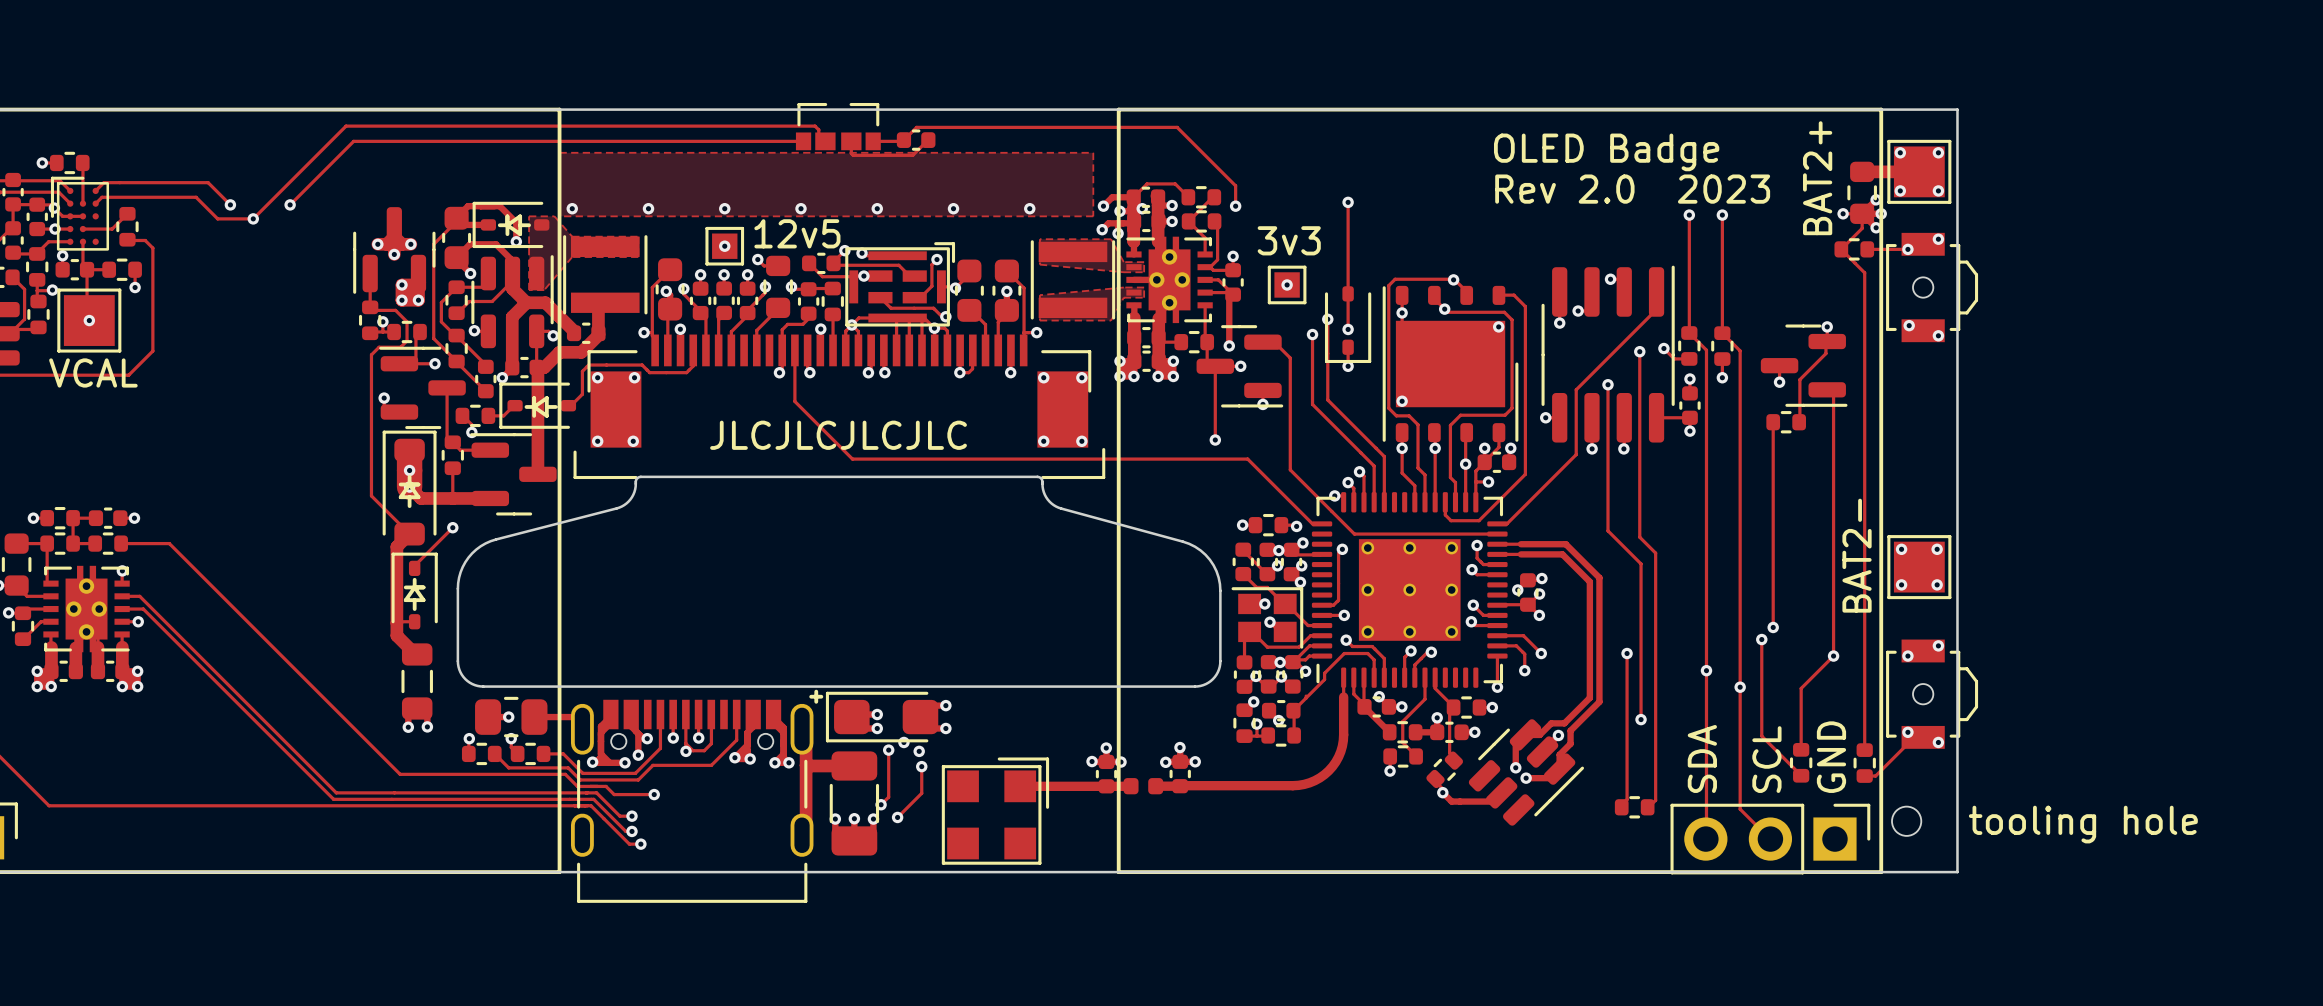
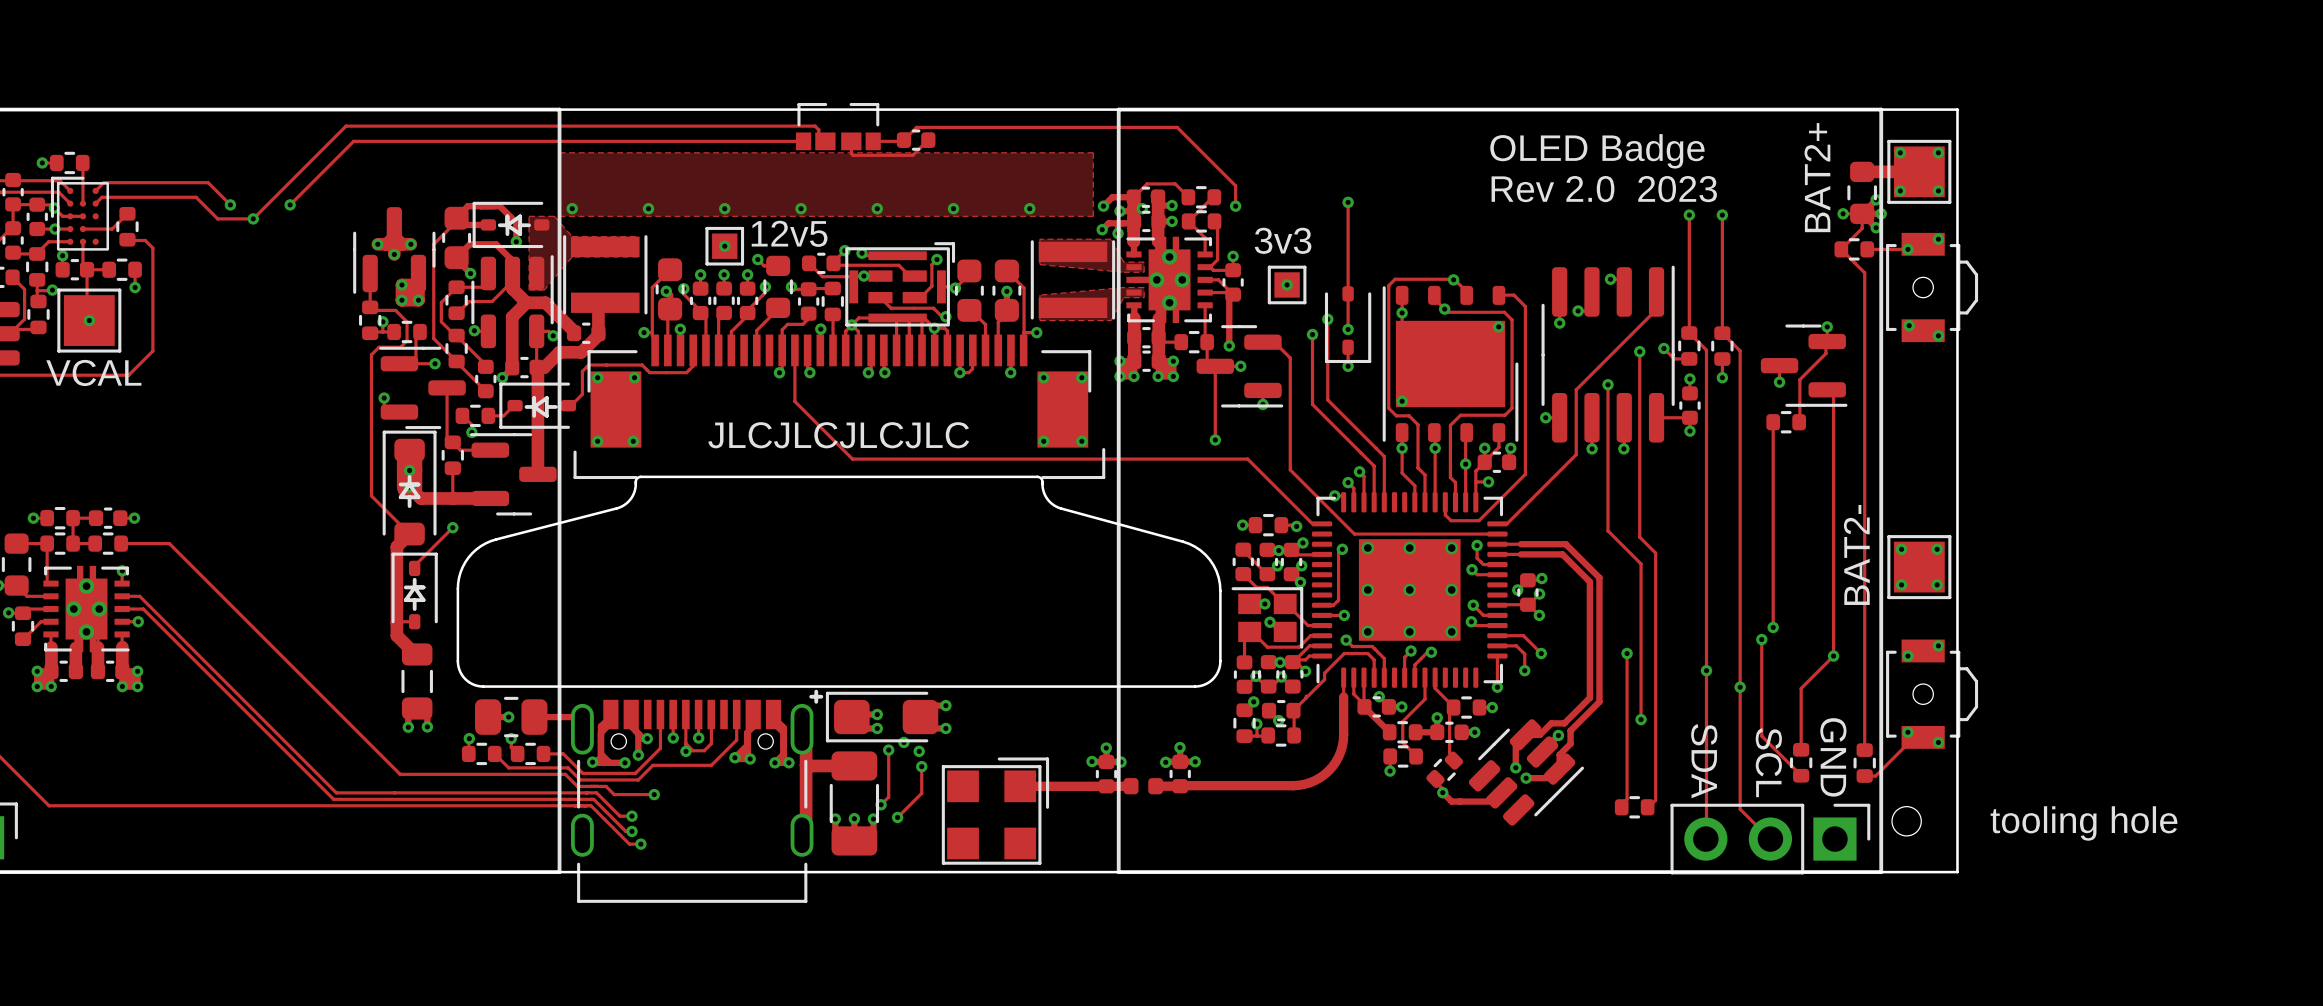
text rotation: 0° (1831, 757) -> 180° (1833, 757)
text rotation: 0° (1702, 758) -> 180° (1704, 761)
text rotation: 0° (1766, 759) -> 180° (1768, 762)

